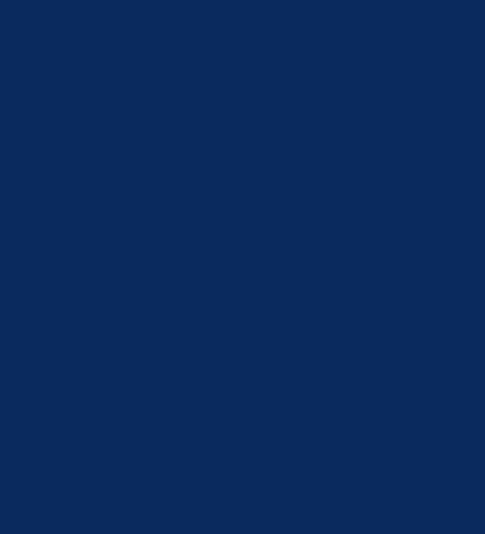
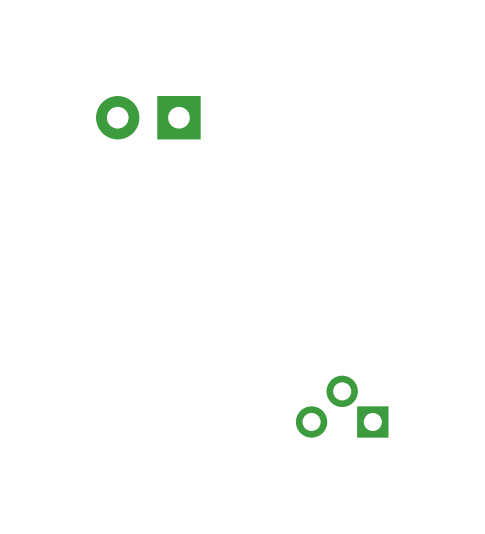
part: none -> (148, 117)
part: none -> (342, 406)

